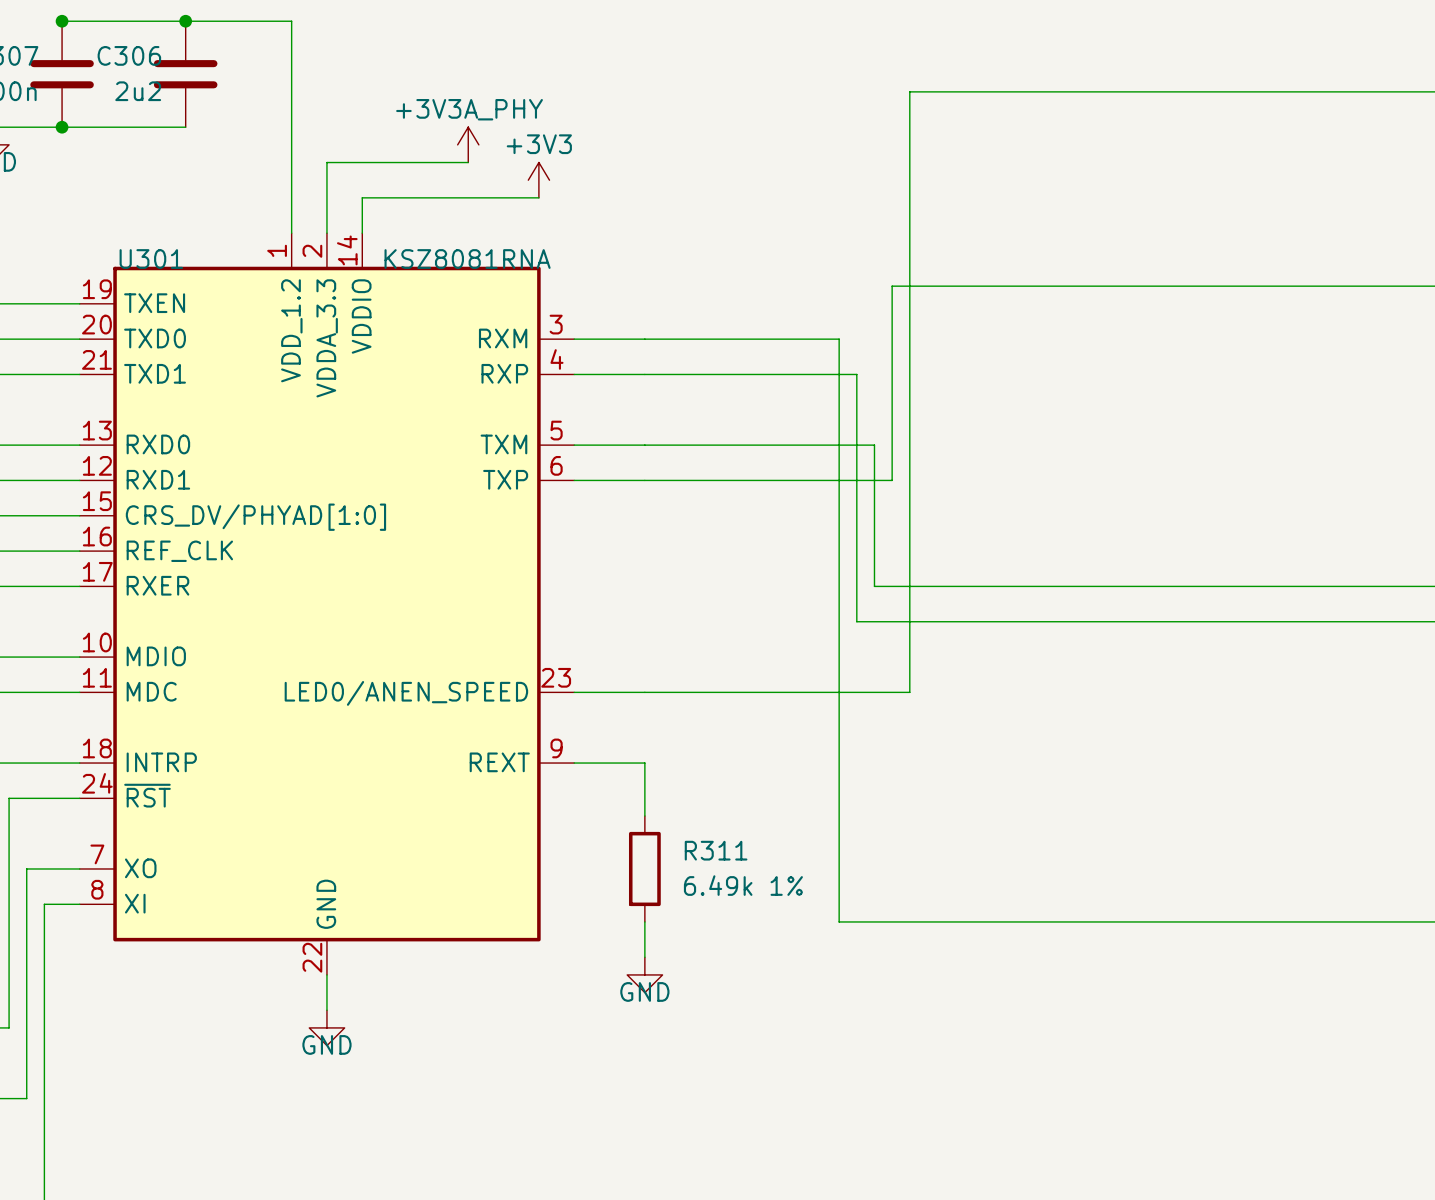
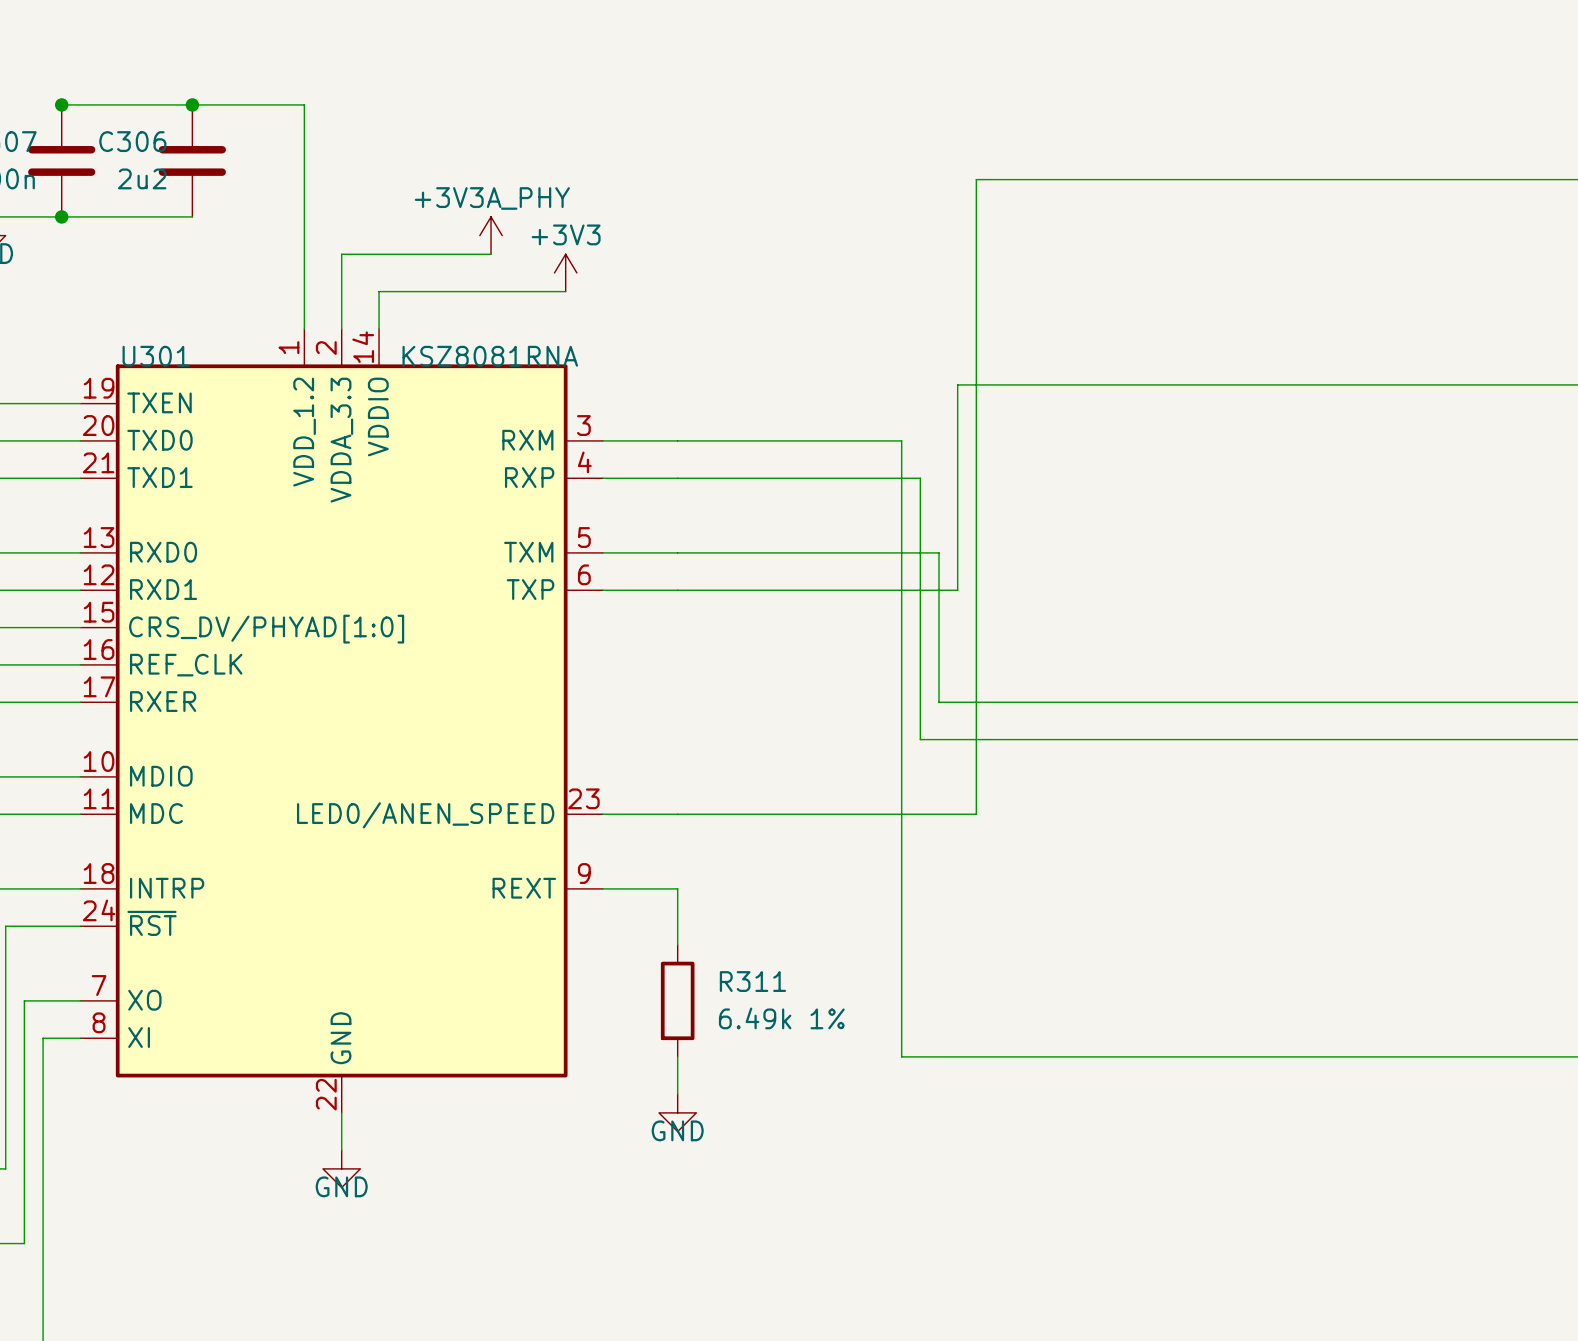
wire: (927, 91) (909, 91) (909, 286) (892, 286) (892, 445) -> (976, 179) (976, 814) (957, 814)
wire: (839, 339) (839, 921) (856, 921) -> (901, 739) (901, 1056)
wire: none -> (883, 440) (901, 440) (901, 478) (920, 478) (920, 552) (939, 552)
wire: (909, 480) (909, 692) -> (957, 590) (939, 590) (939, 702)
wire: (874, 586) (892, 586) -> none
wire: (856, 621) (874, 621) -> (920, 702) (920, 739)

